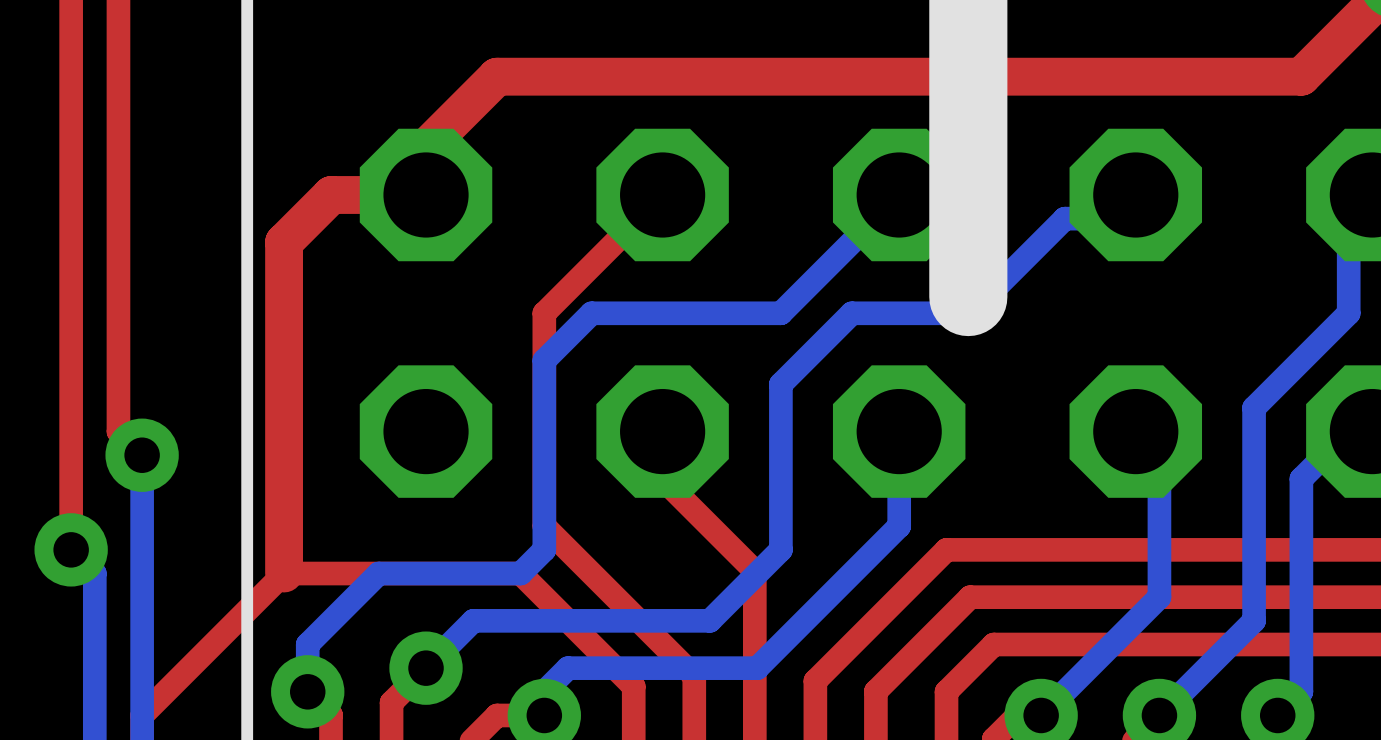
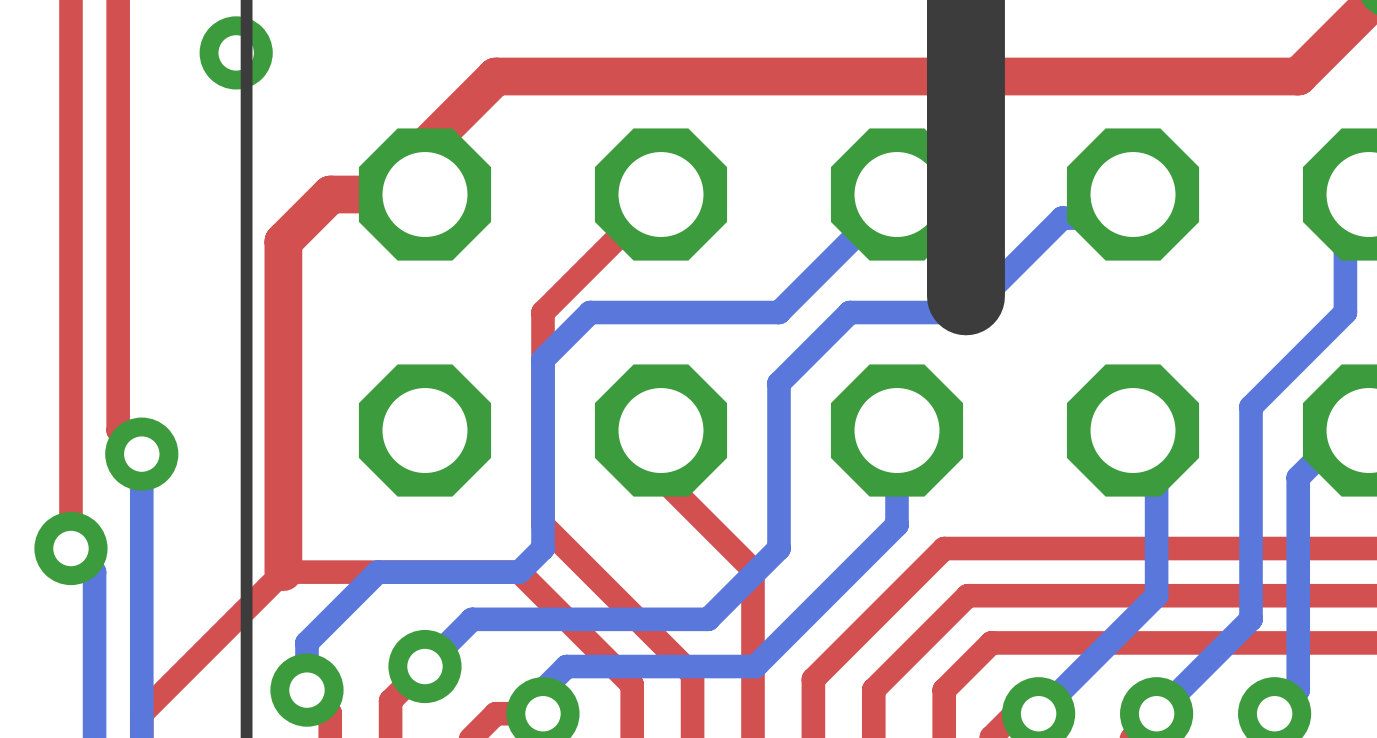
via: none -> (236, 52)

